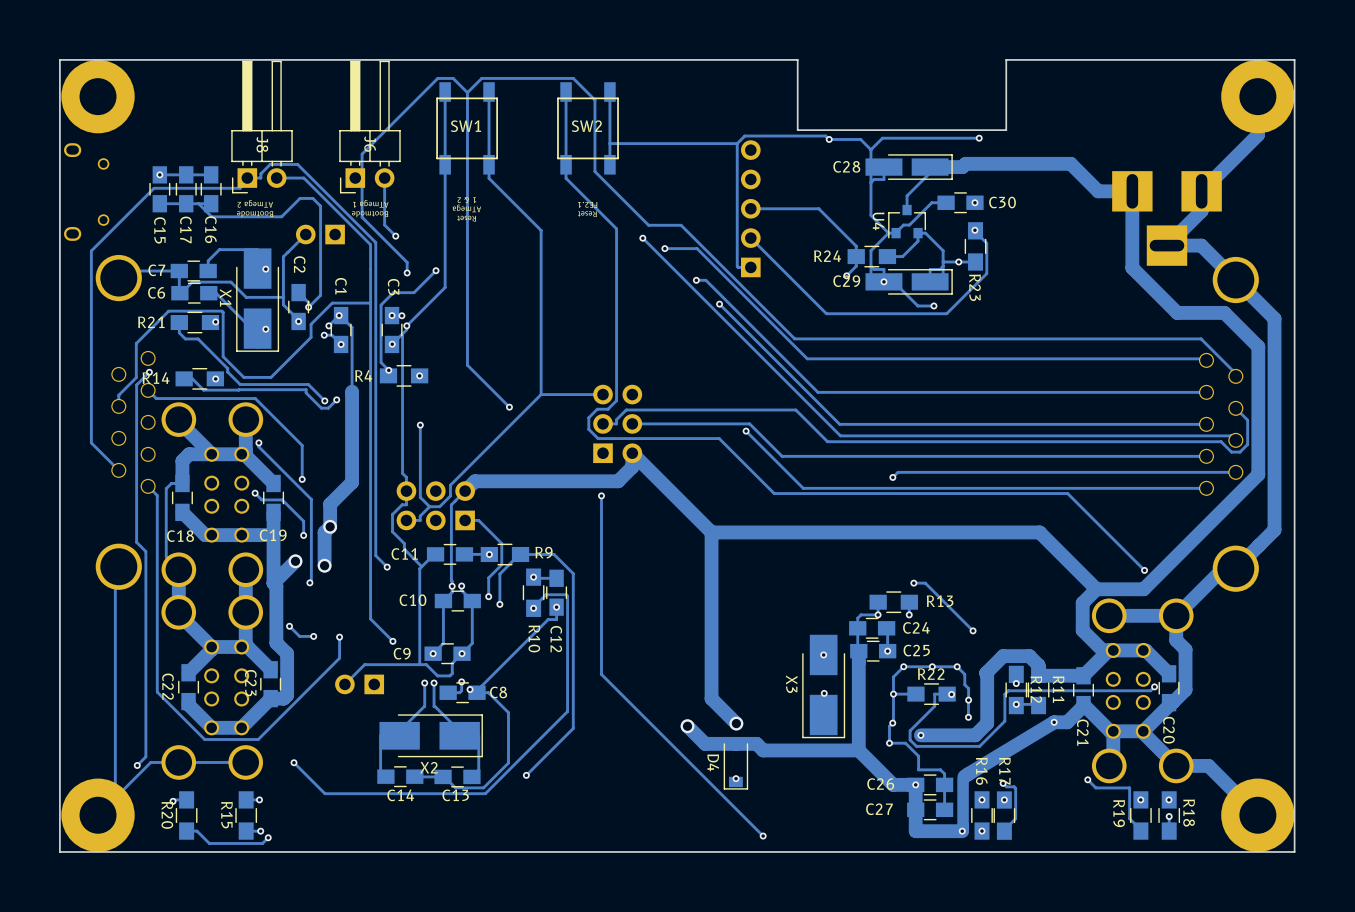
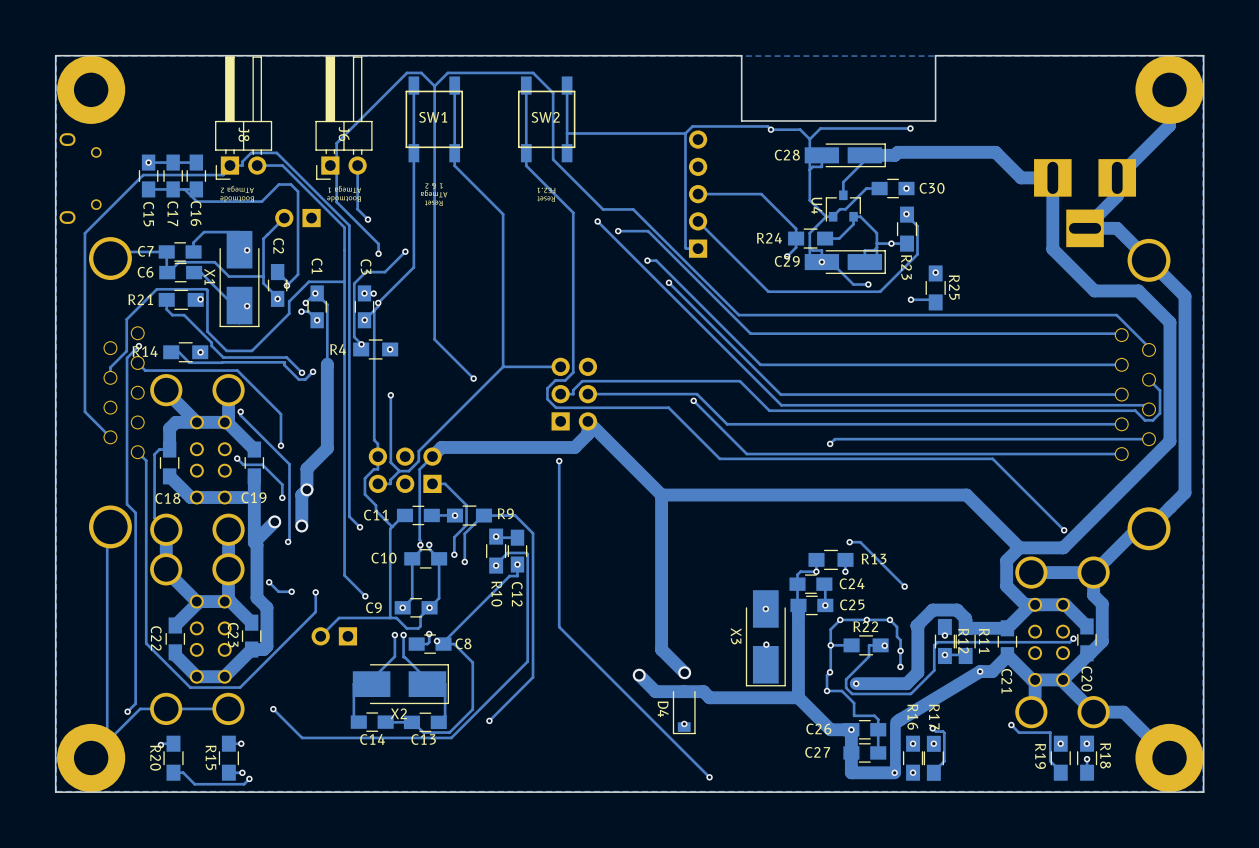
zone outline: none -> (1203, 56) (56, 56) (56, 791) (1203, 791) (1203, 56)
via: none -> (935, 272)
R25: none -> (935, 287)
track: none -> (910, 299) (933, 299) (935, 302)
via: none -> (910, 299)

